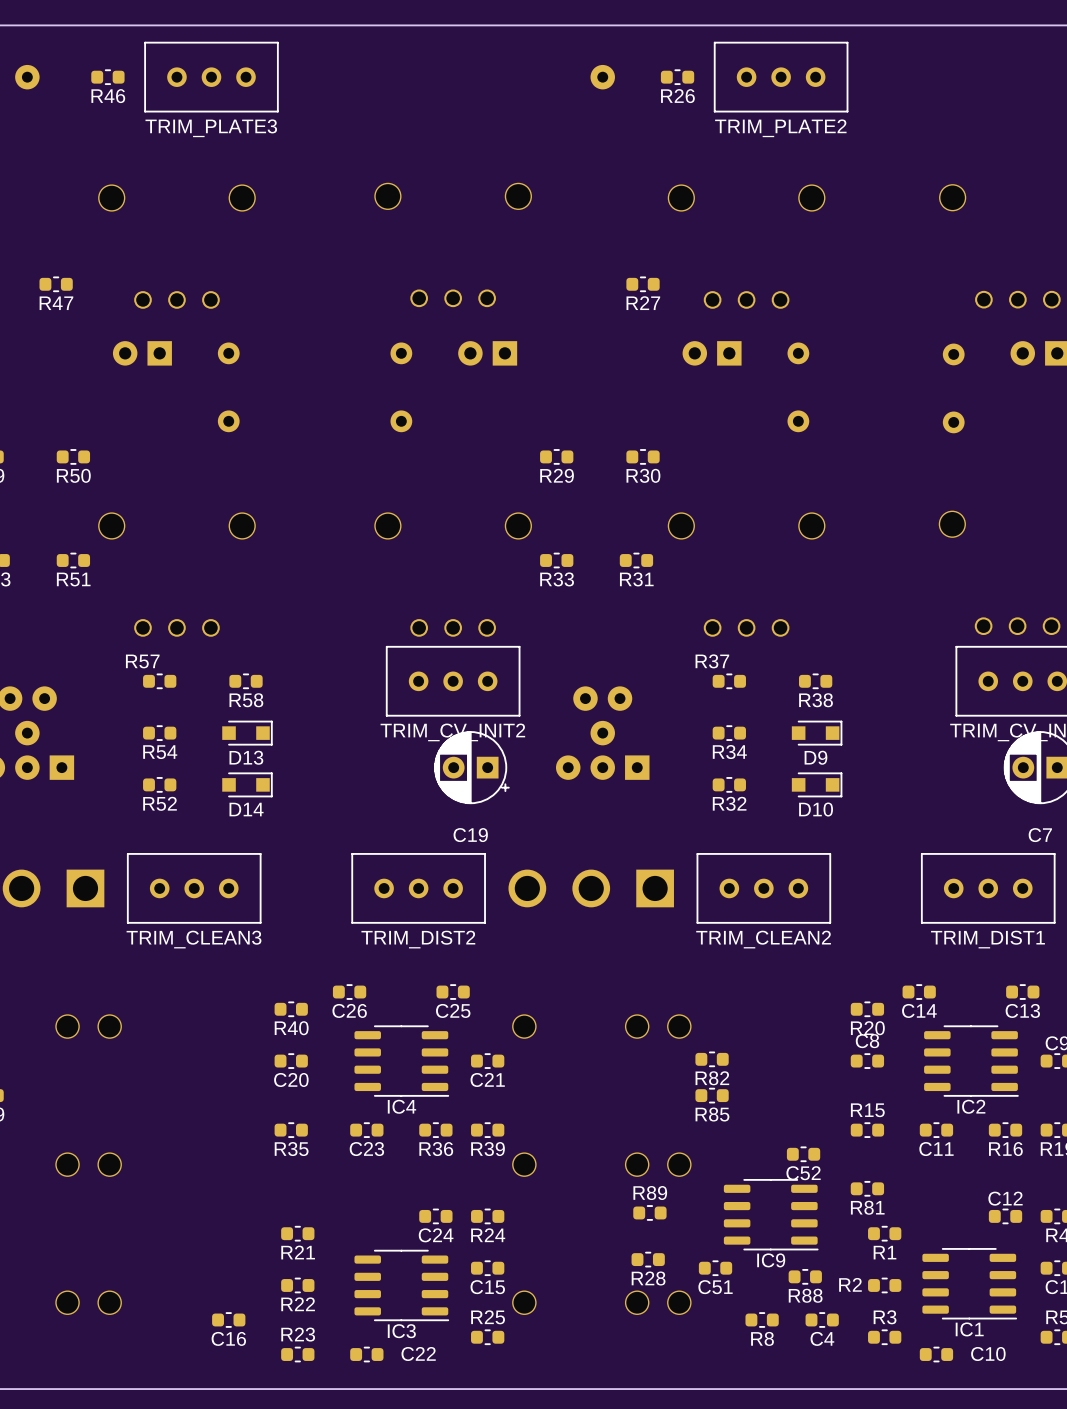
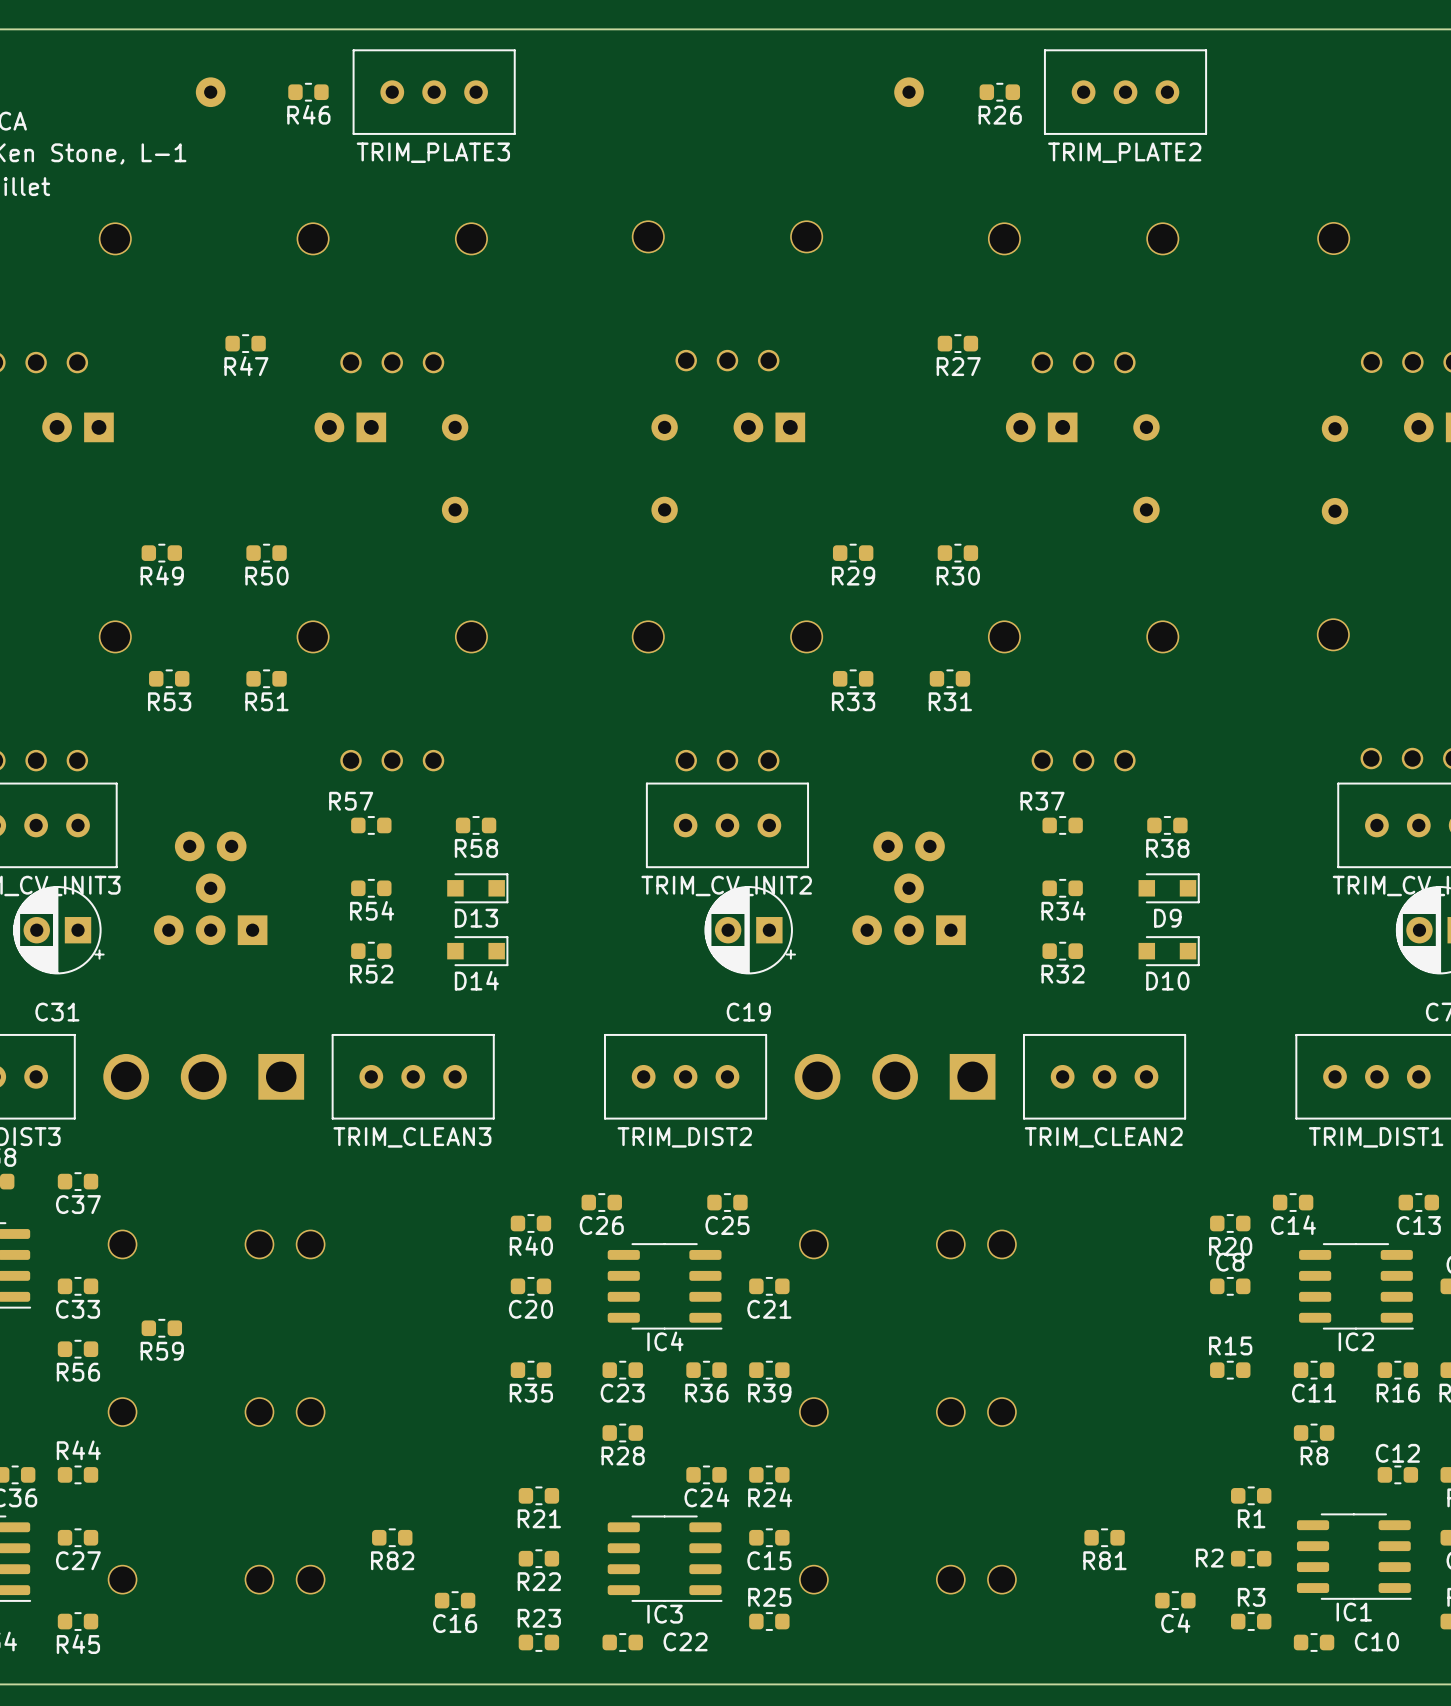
R82 position: (712, 1059) -> (392, 1537)
R85: (712, 1095) -> none
C52: (803, 1154) -> none
R81 position: (867, 1188) -> (1104, 1537)
R89: (649, 1212) -> none
IC9: (771, 1214) -> none
R28 position: (648, 1259) -> (622, 1433)
C51: (715, 1268) -> none
R88: (805, 1276) -> none
R8 position: (762, 1319) -> (1314, 1433)

